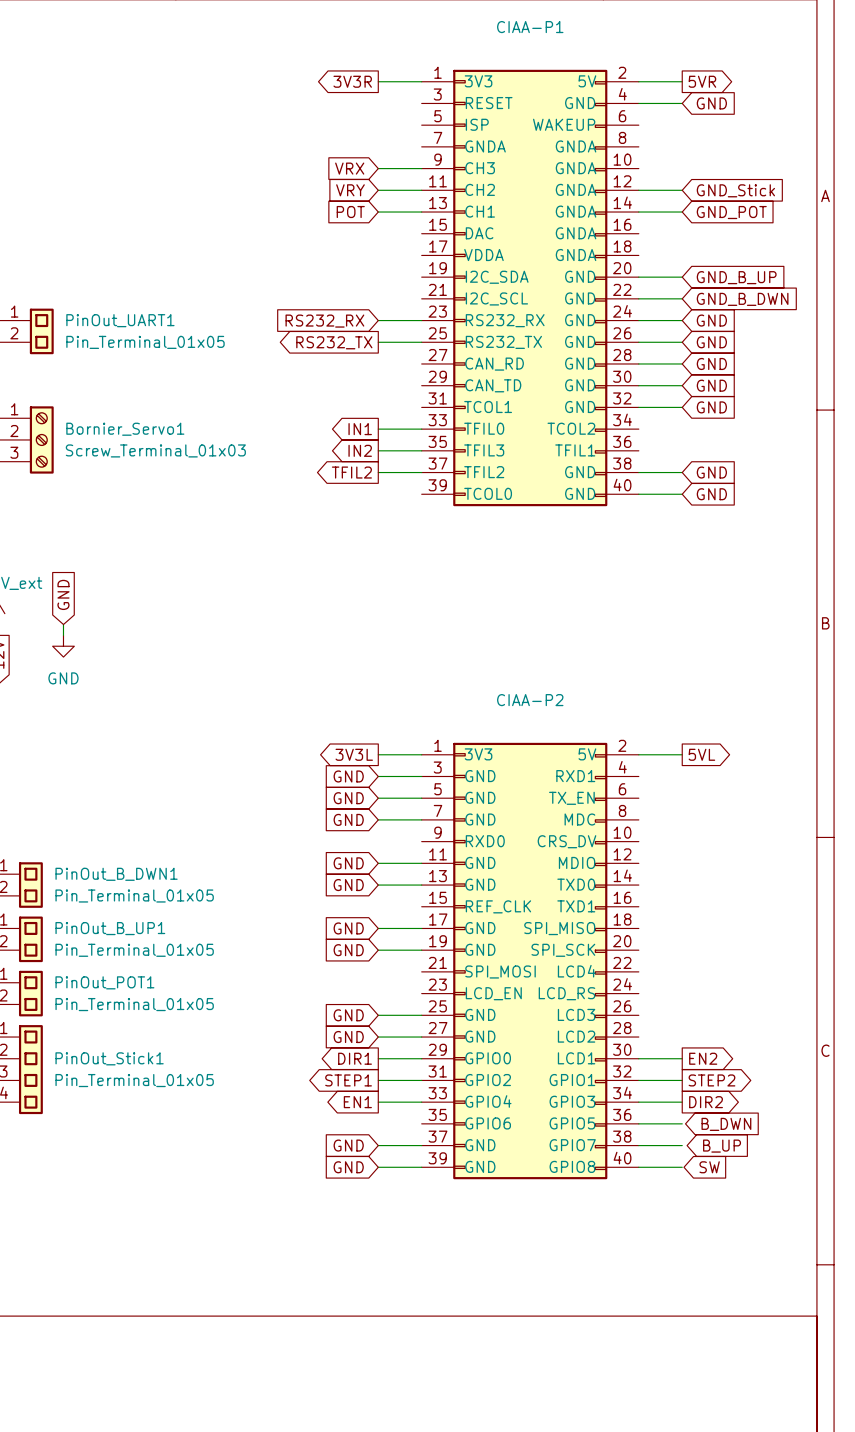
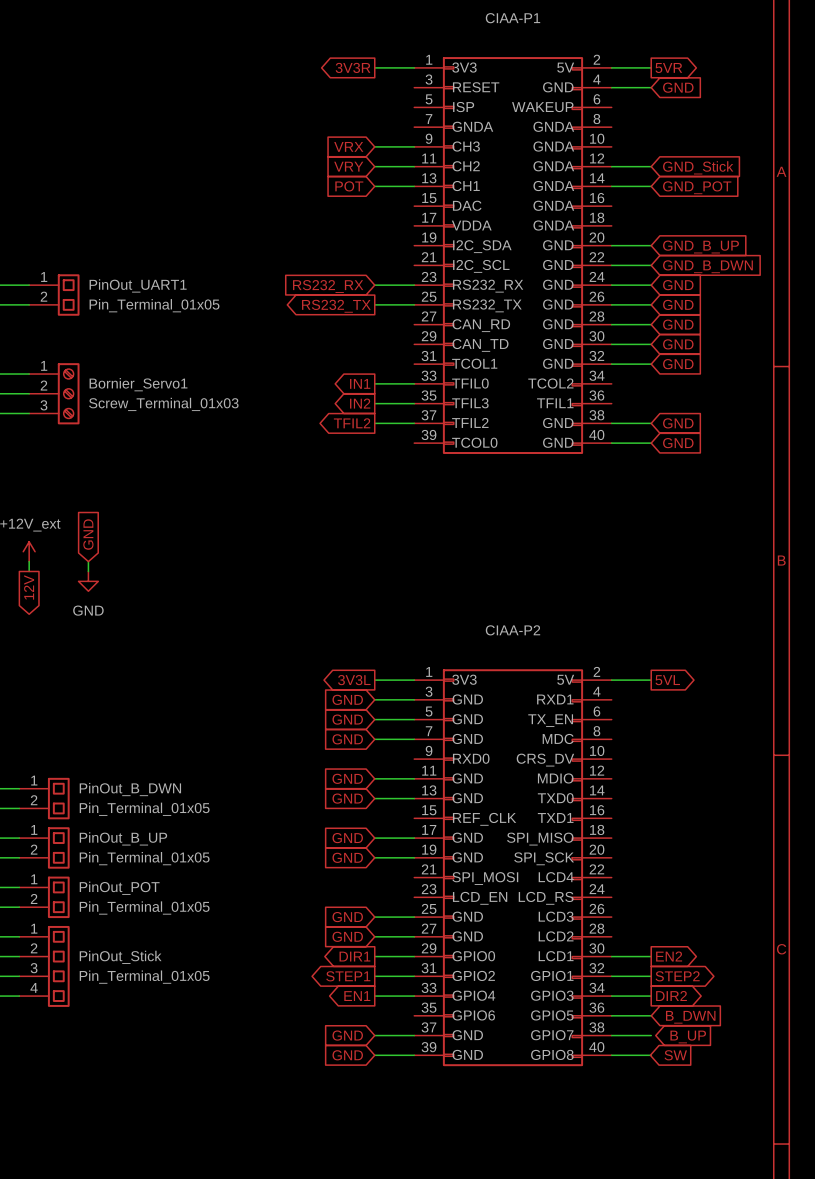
PinOut_B_DWN1 name: PinOut_B_DWN1 (116, 874) -> PinOut_B_DWN (130, 789)
PinOut_B_UP1 name: PinOut_B_UP1 (110, 928) -> PinOut_B_UP (123, 838)
PinOut_POT1 name: PinOut_POT1 (104, 982) -> PinOut_POT (119, 888)
PinOut_Stick1 name: PinOut_Stick1 (109, 1058) -> PinOut_Stick (120, 957)

